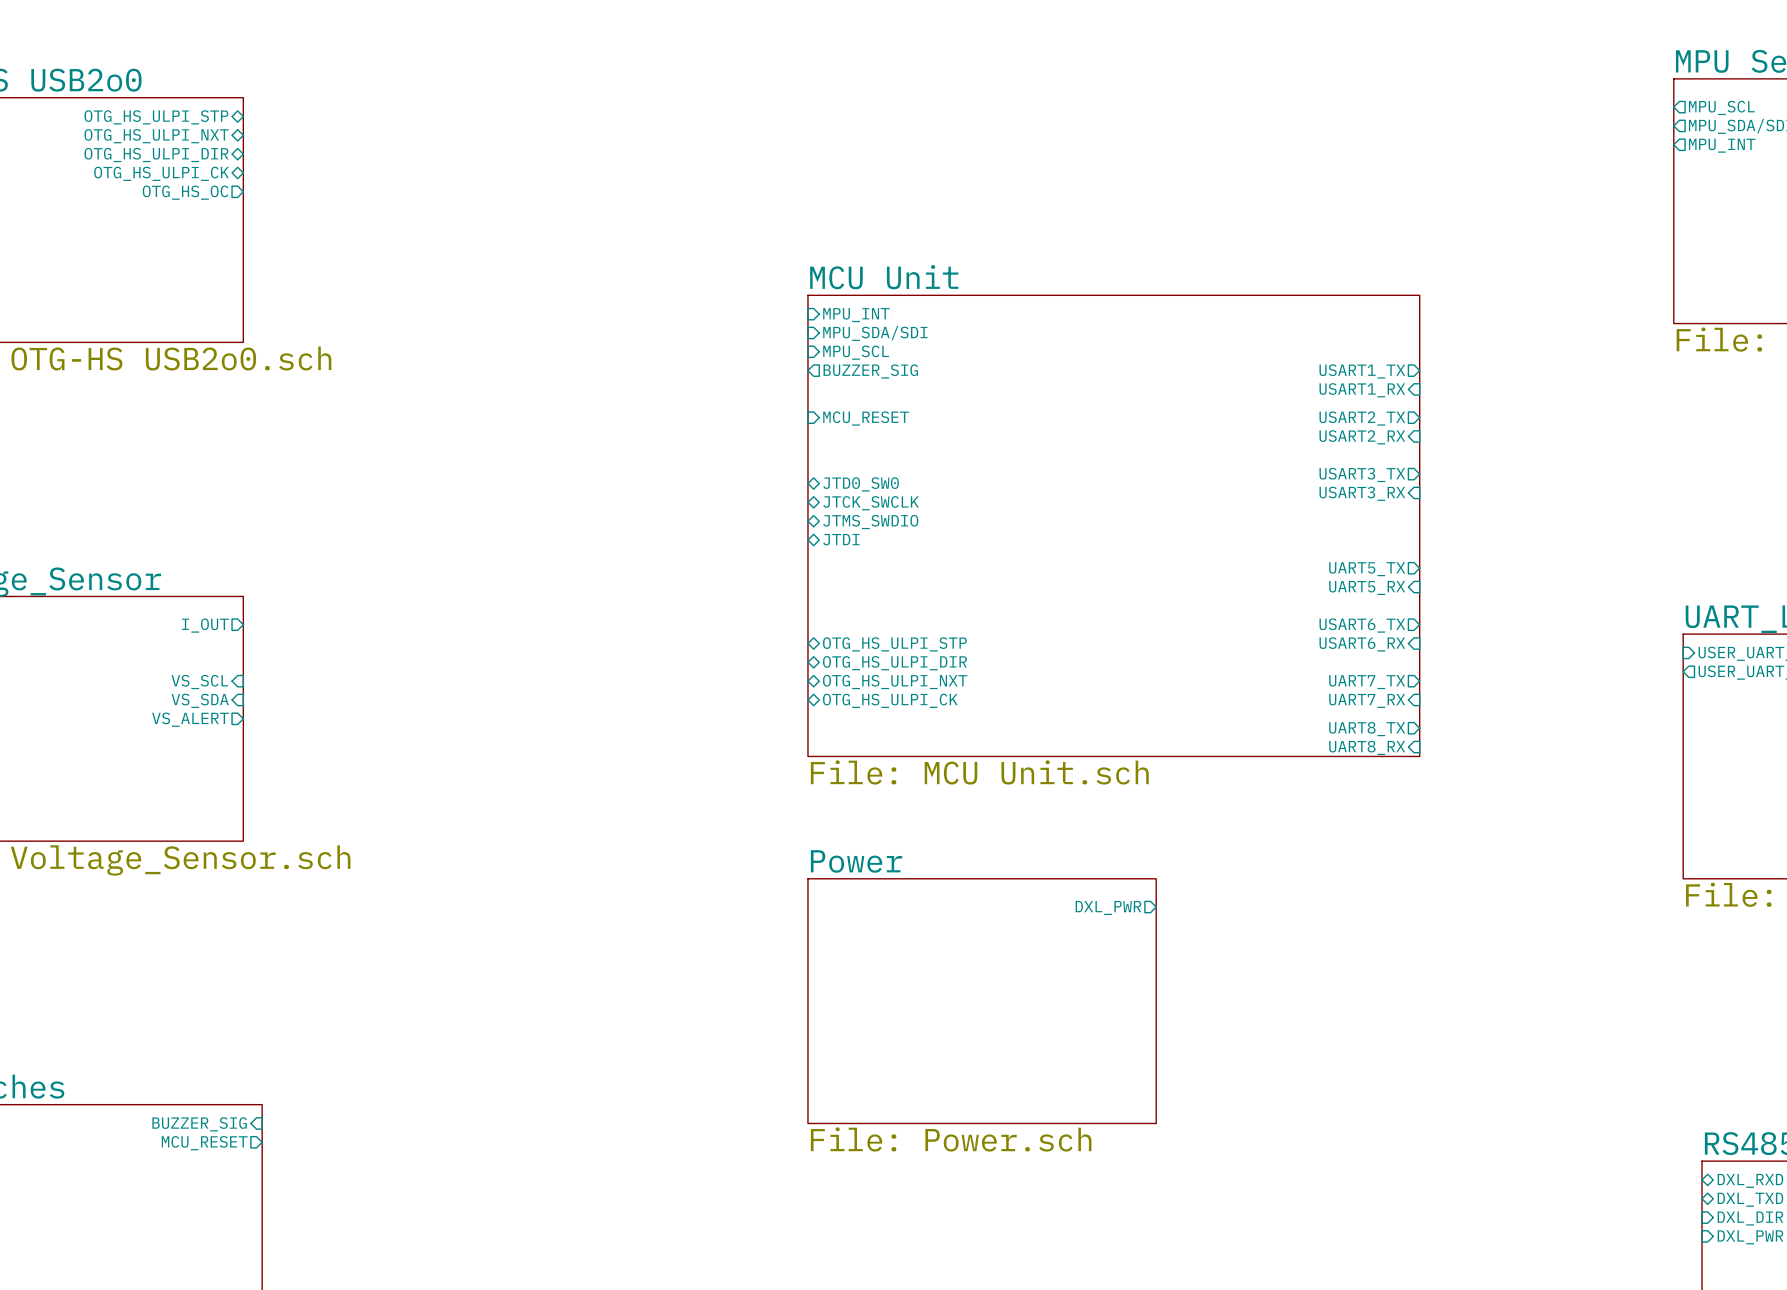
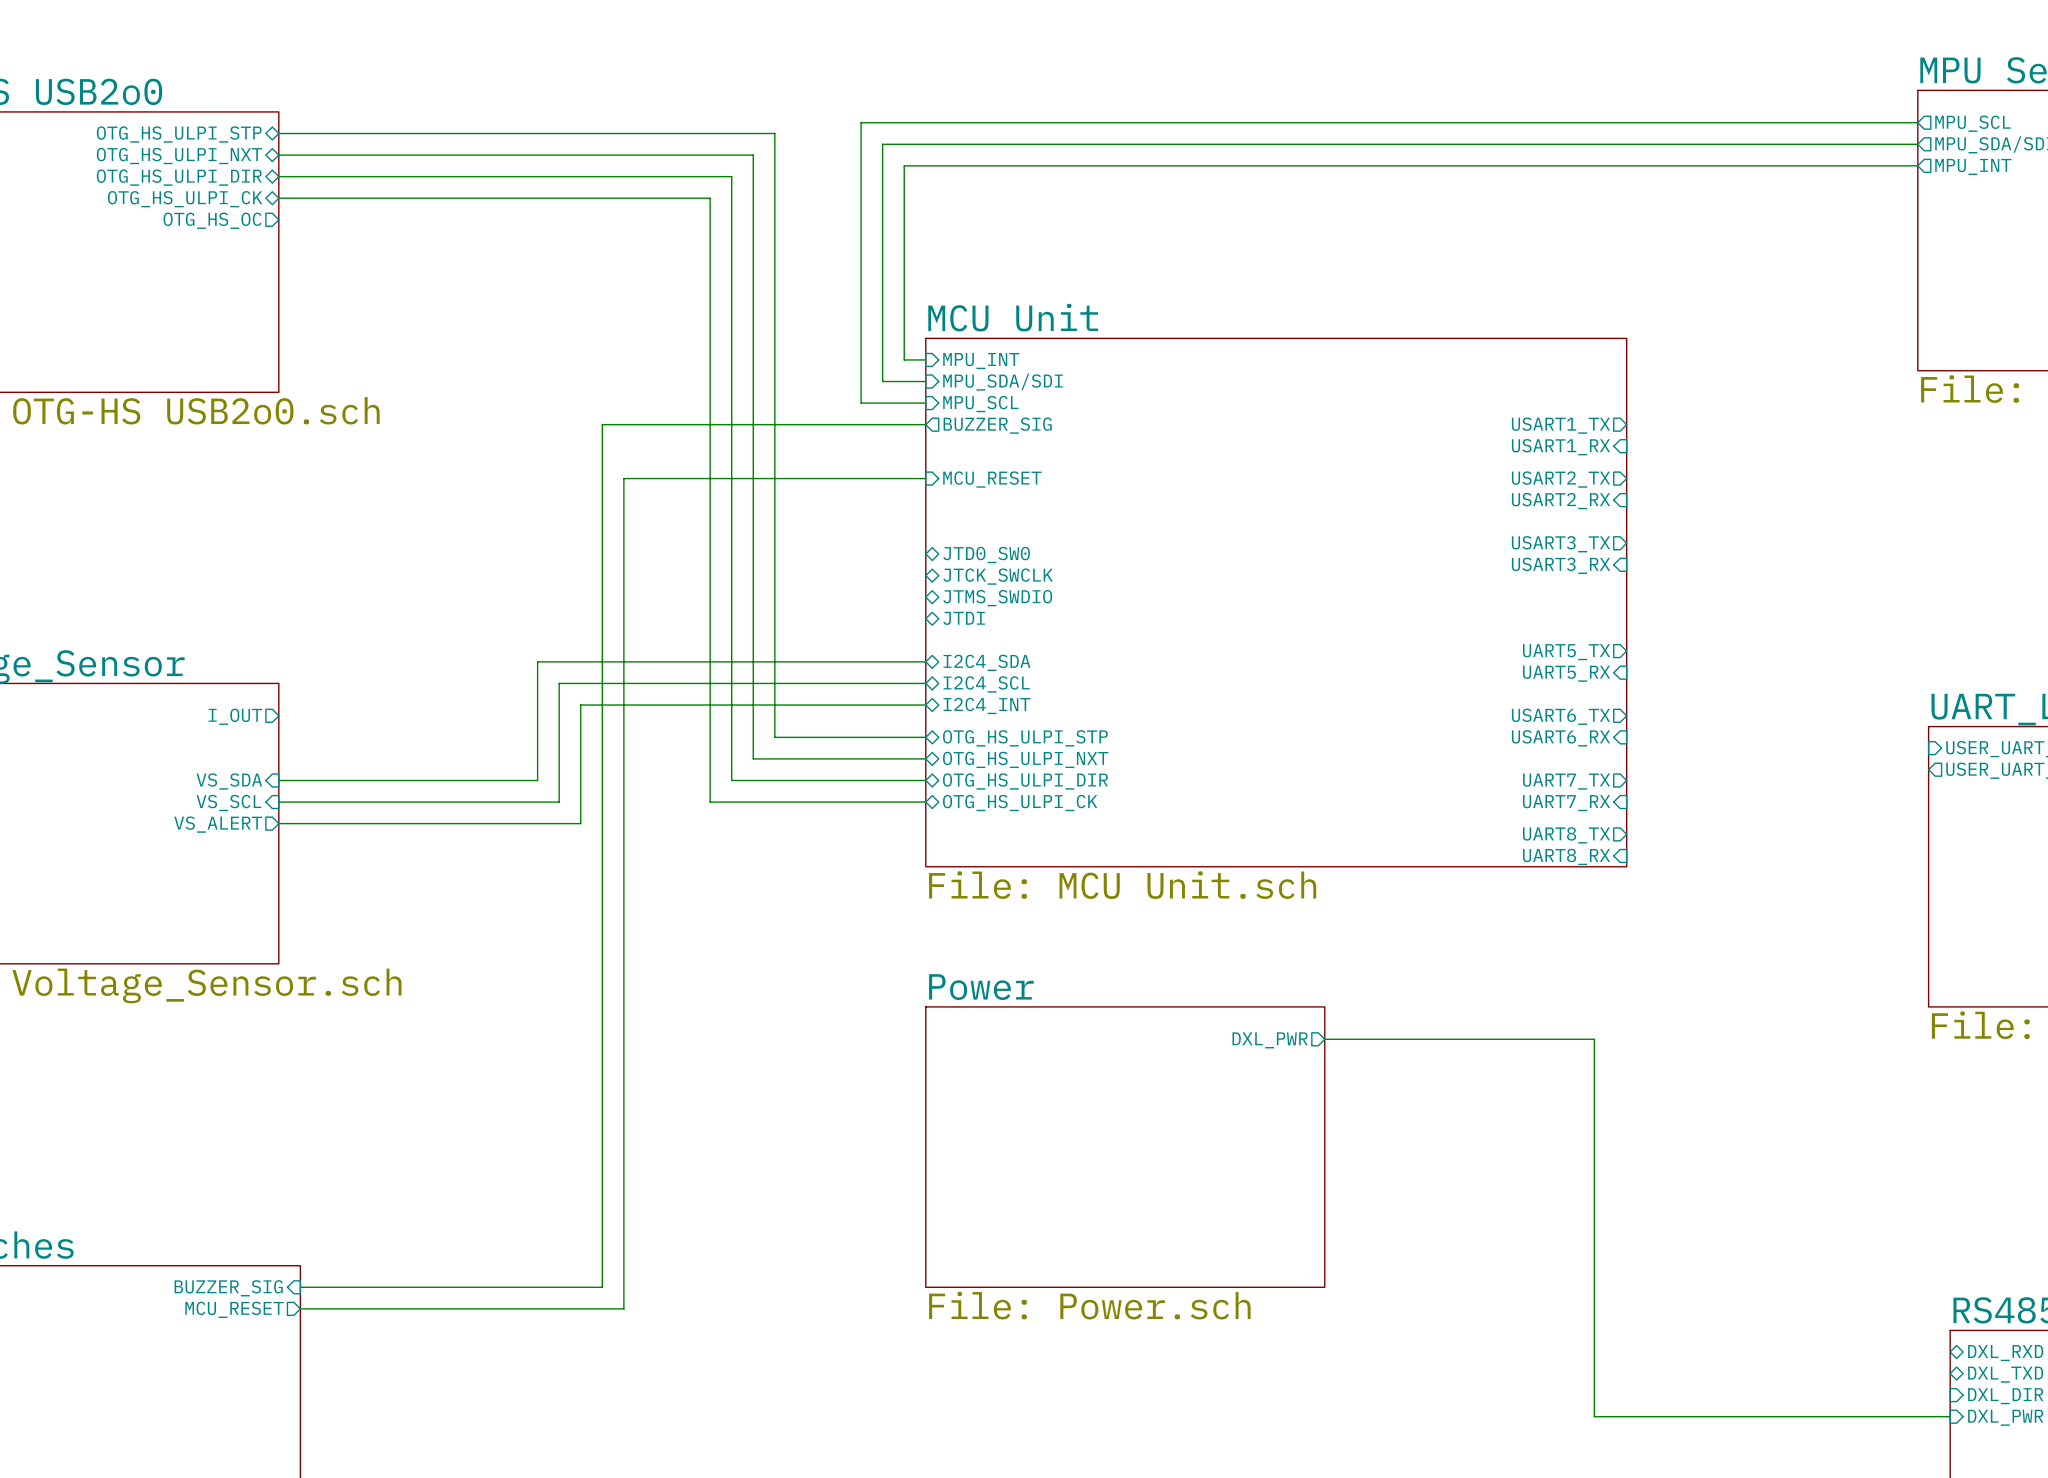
wire: none -> (1917, 122) (861, 122) (861, 403) (925, 403)
wire: none -> (278, 133) (774, 133) (774, 737) (925, 737)
wire: none -> (1917, 144) (882, 144) (882, 381) (925, 381)
wire: none -> (278, 155) (753, 155) (753, 758) (925, 758)
wire: none -> (1917, 165) (904, 165) (904, 359) (925, 359)
wire: none -> (278, 176) (731, 176) (731, 780) (925, 780)
wire: none -> (278, 198) (710, 198) (710, 802) (925, 802)
wire: none -> (925, 424) (602, 424) (602, 1287) (300, 1287)
wire: none -> (925, 478) (623, 478) (623, 1308) (300, 1308)
wire: none -> (925, 661) (537, 661) (537, 780) (278, 780)
sheet pin: none -> I2C4_SDA (986, 662)
wire: none -> (925, 683) (559, 683) (559, 802) (278, 802)
sheet pin: none -> I2C4_SCL (986, 684)
wire: none -> (925, 705) (580, 705) (580, 823) (278, 823)
sheet pin: none -> I2C4_INT (987, 705)
sheet pin: OTG_HS_ULPI_DIR (894, 663) -> OTG_HS_ULPI_NXT (1025, 759)
sheet pin: VS_SCL (199, 682) -> VS_SDA (229, 781)
sheet pin: OTG_HS_ULPI_NXT (895, 682) -> OTG_HS_ULPI_DIR (1025, 781)
sheet pin: VS_SDA (200, 700) -> VS_SCL (229, 803)
wire: none -> (1324, 1039) (1594, 1039) (1594, 1416) (1950, 1416)

